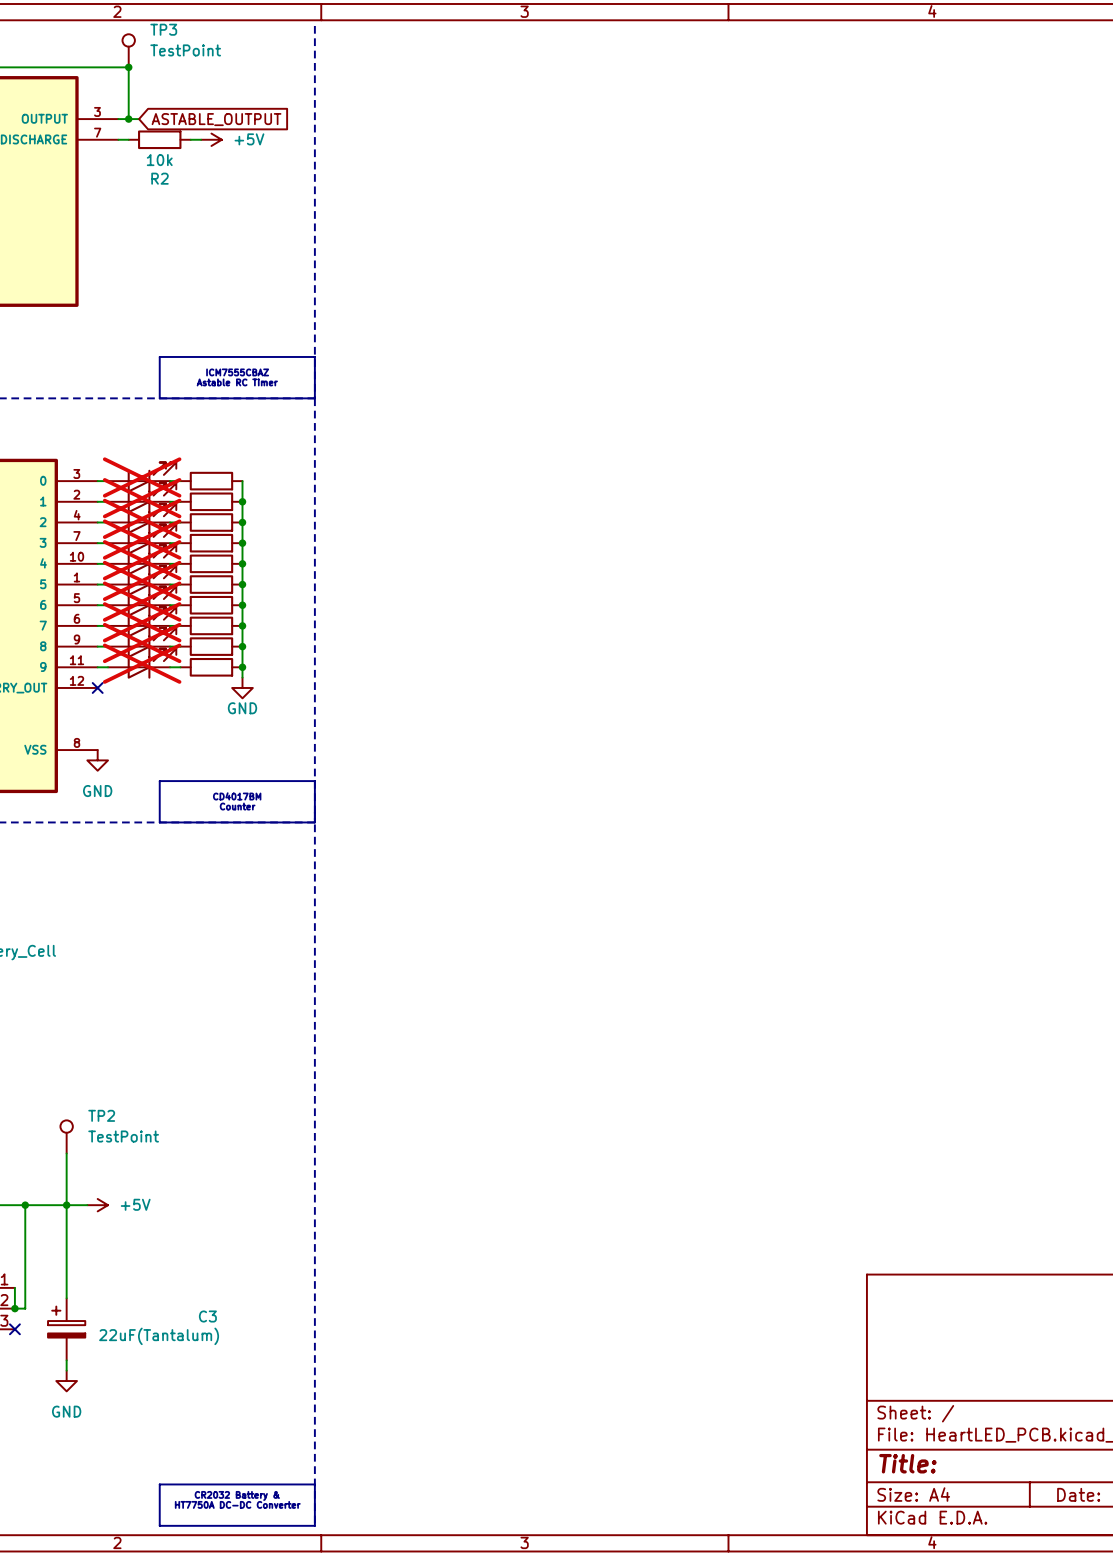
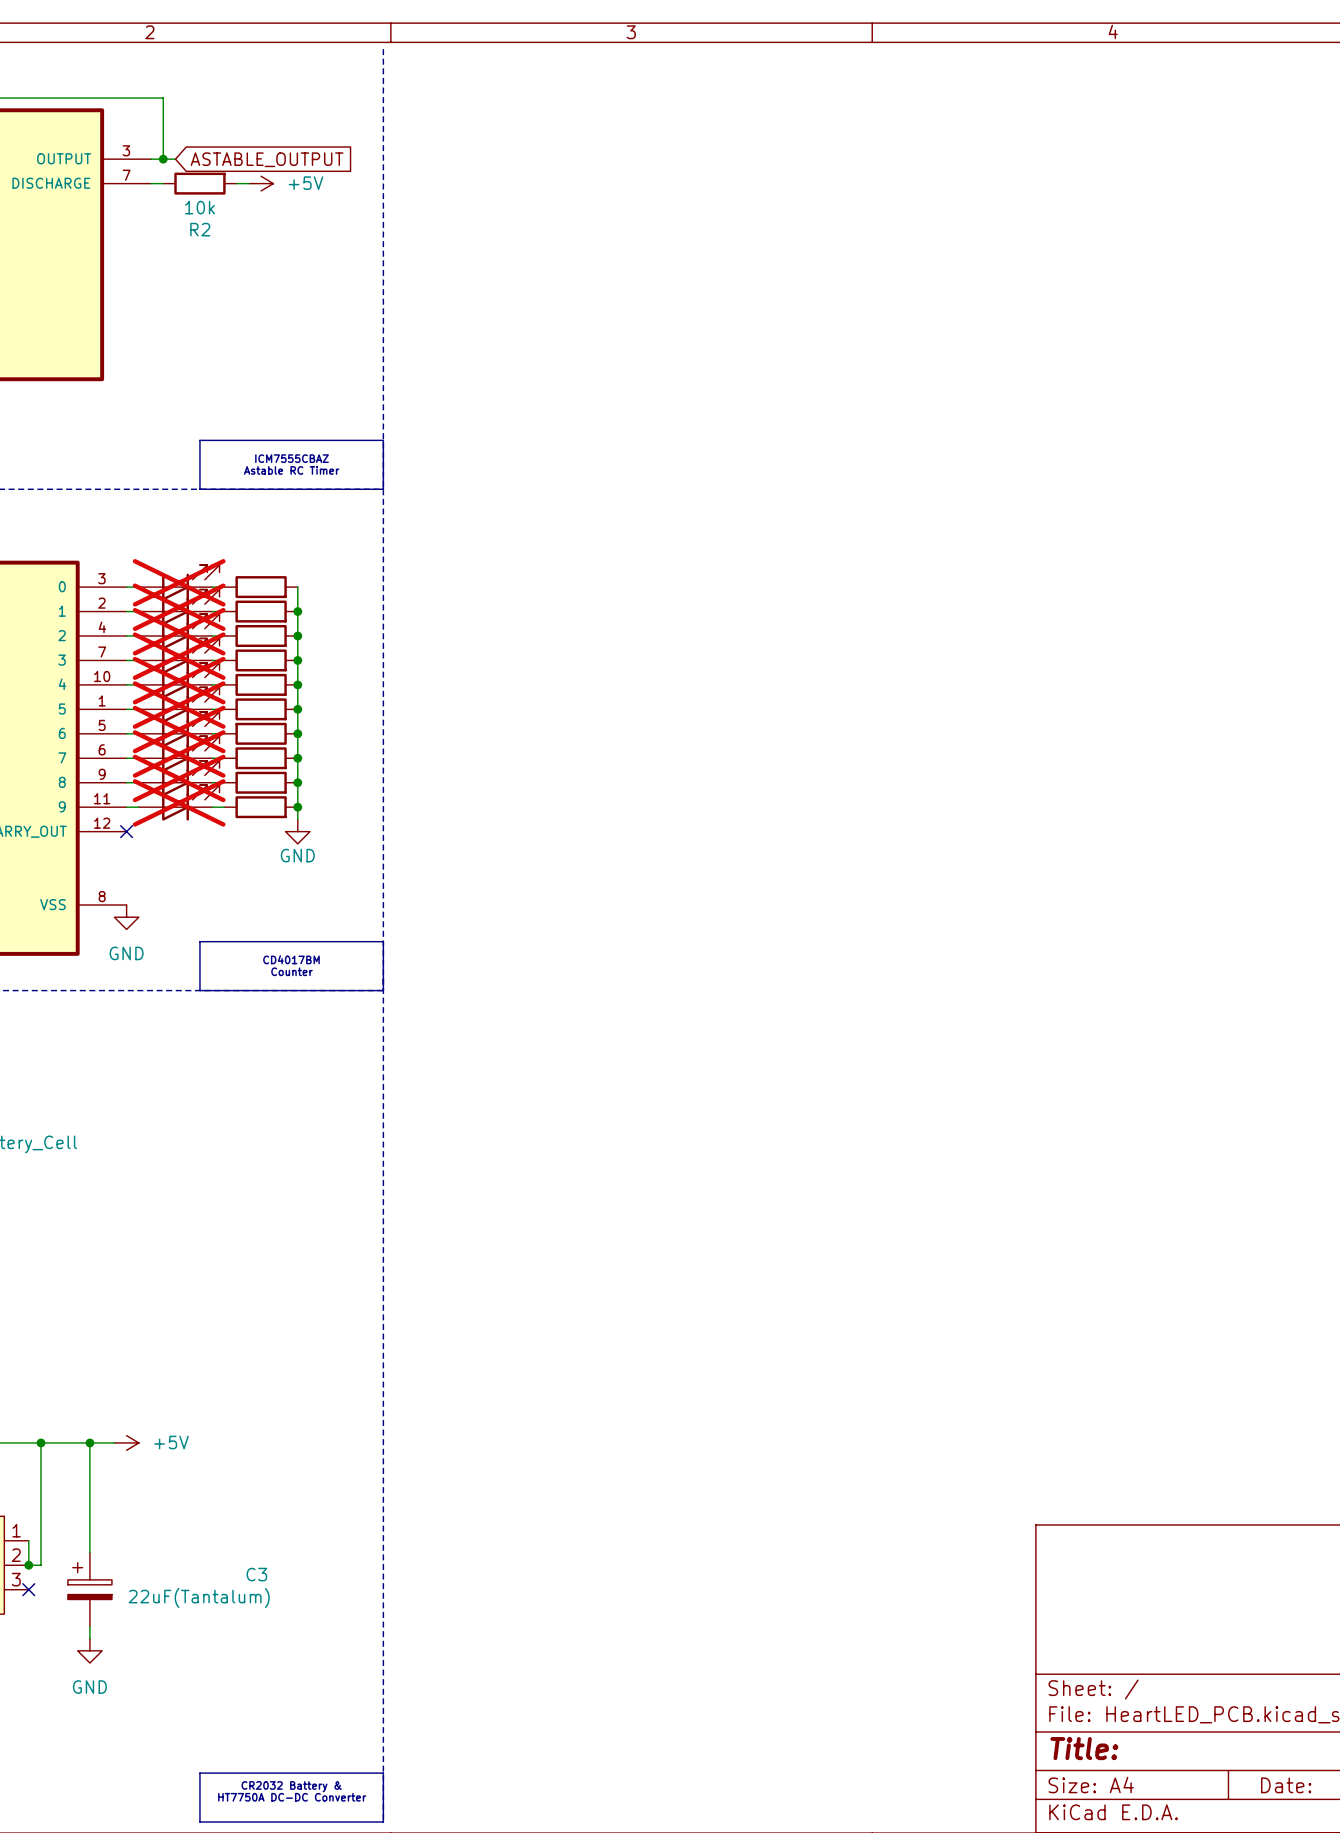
TP3: TestPoint (128, 50) -> none
junction: (128, 67) -> none
TP2: TestPoint (66, 1136) -> none
wire: (66, 1153) (66, 1205) -> none

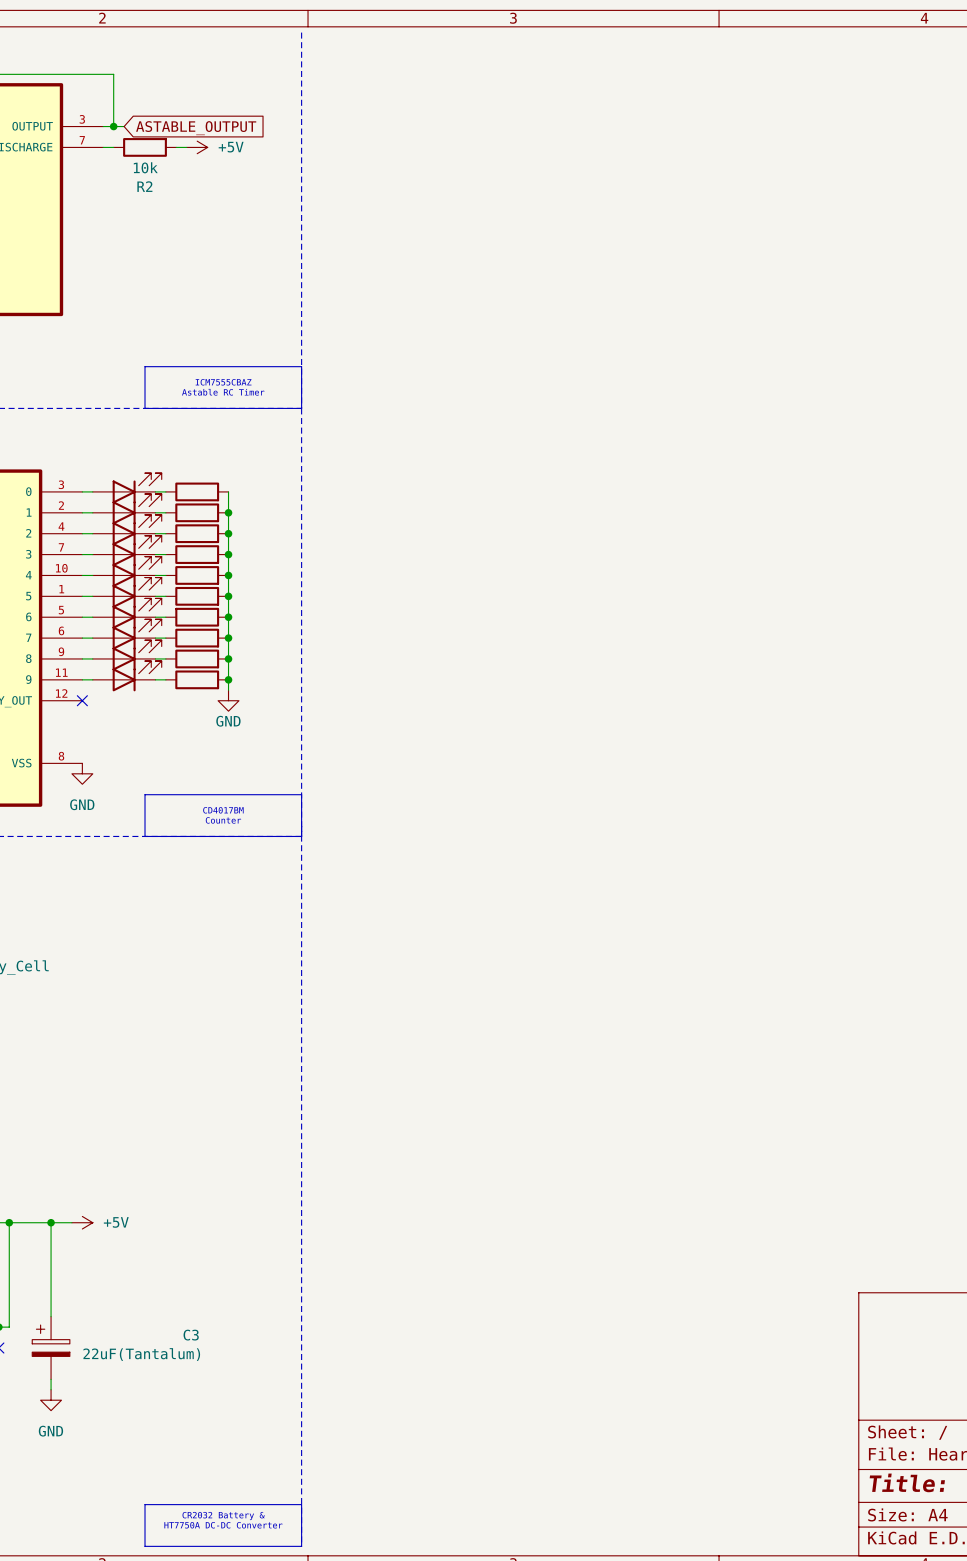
part do-not-place cross: (179, 582) -> none
part do-not-place cross: (179, 607) -> none
part do-not-place cross: (179, 631) -> none
part do-not-place cross: (179, 656) -> none
part do-not-place cross: (179, 680) -> none
part do-not-place cross: (179, 705) -> none
part do-not-place cross: (179, 729) -> none
part do-not-place cross: (179, 753) -> none
part do-not-place cross: (179, 778) -> none
part do-not-place cross: (179, 802) -> none

